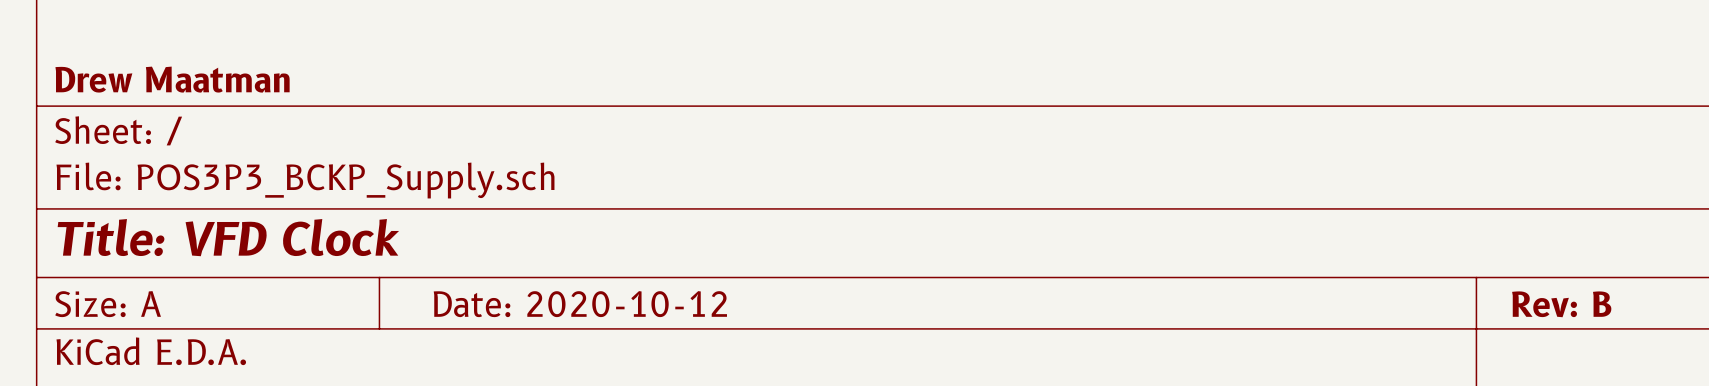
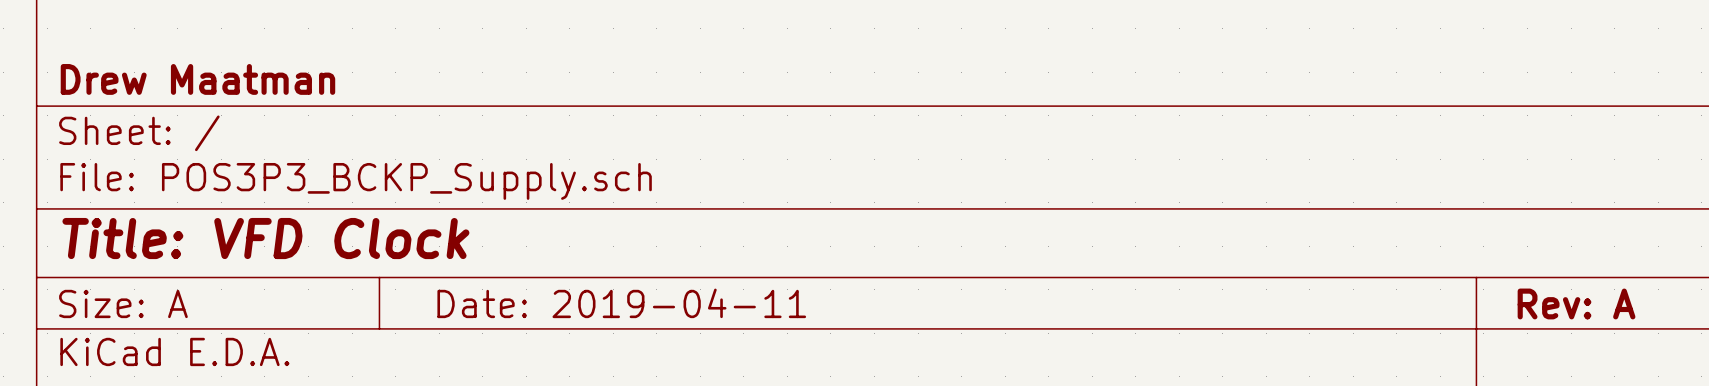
title block: Date: 2020-10-12 (580, 304) -> Date: 2019-04-11 (621, 303)
title block: Rev: B (1561, 304) -> Rev: A (1576, 303)

